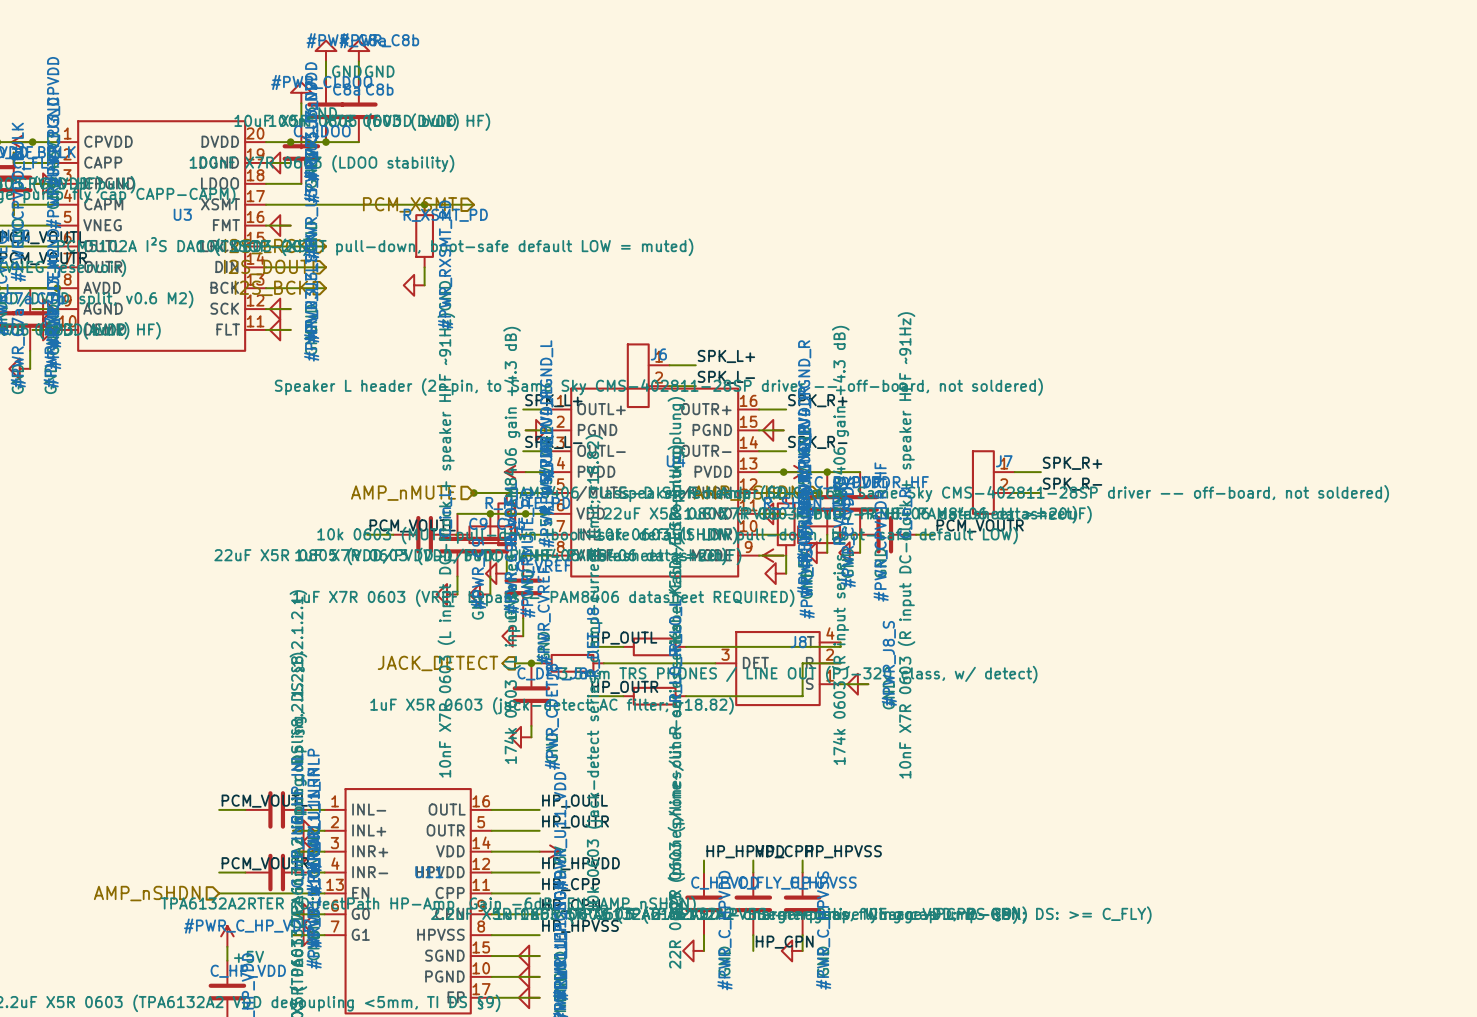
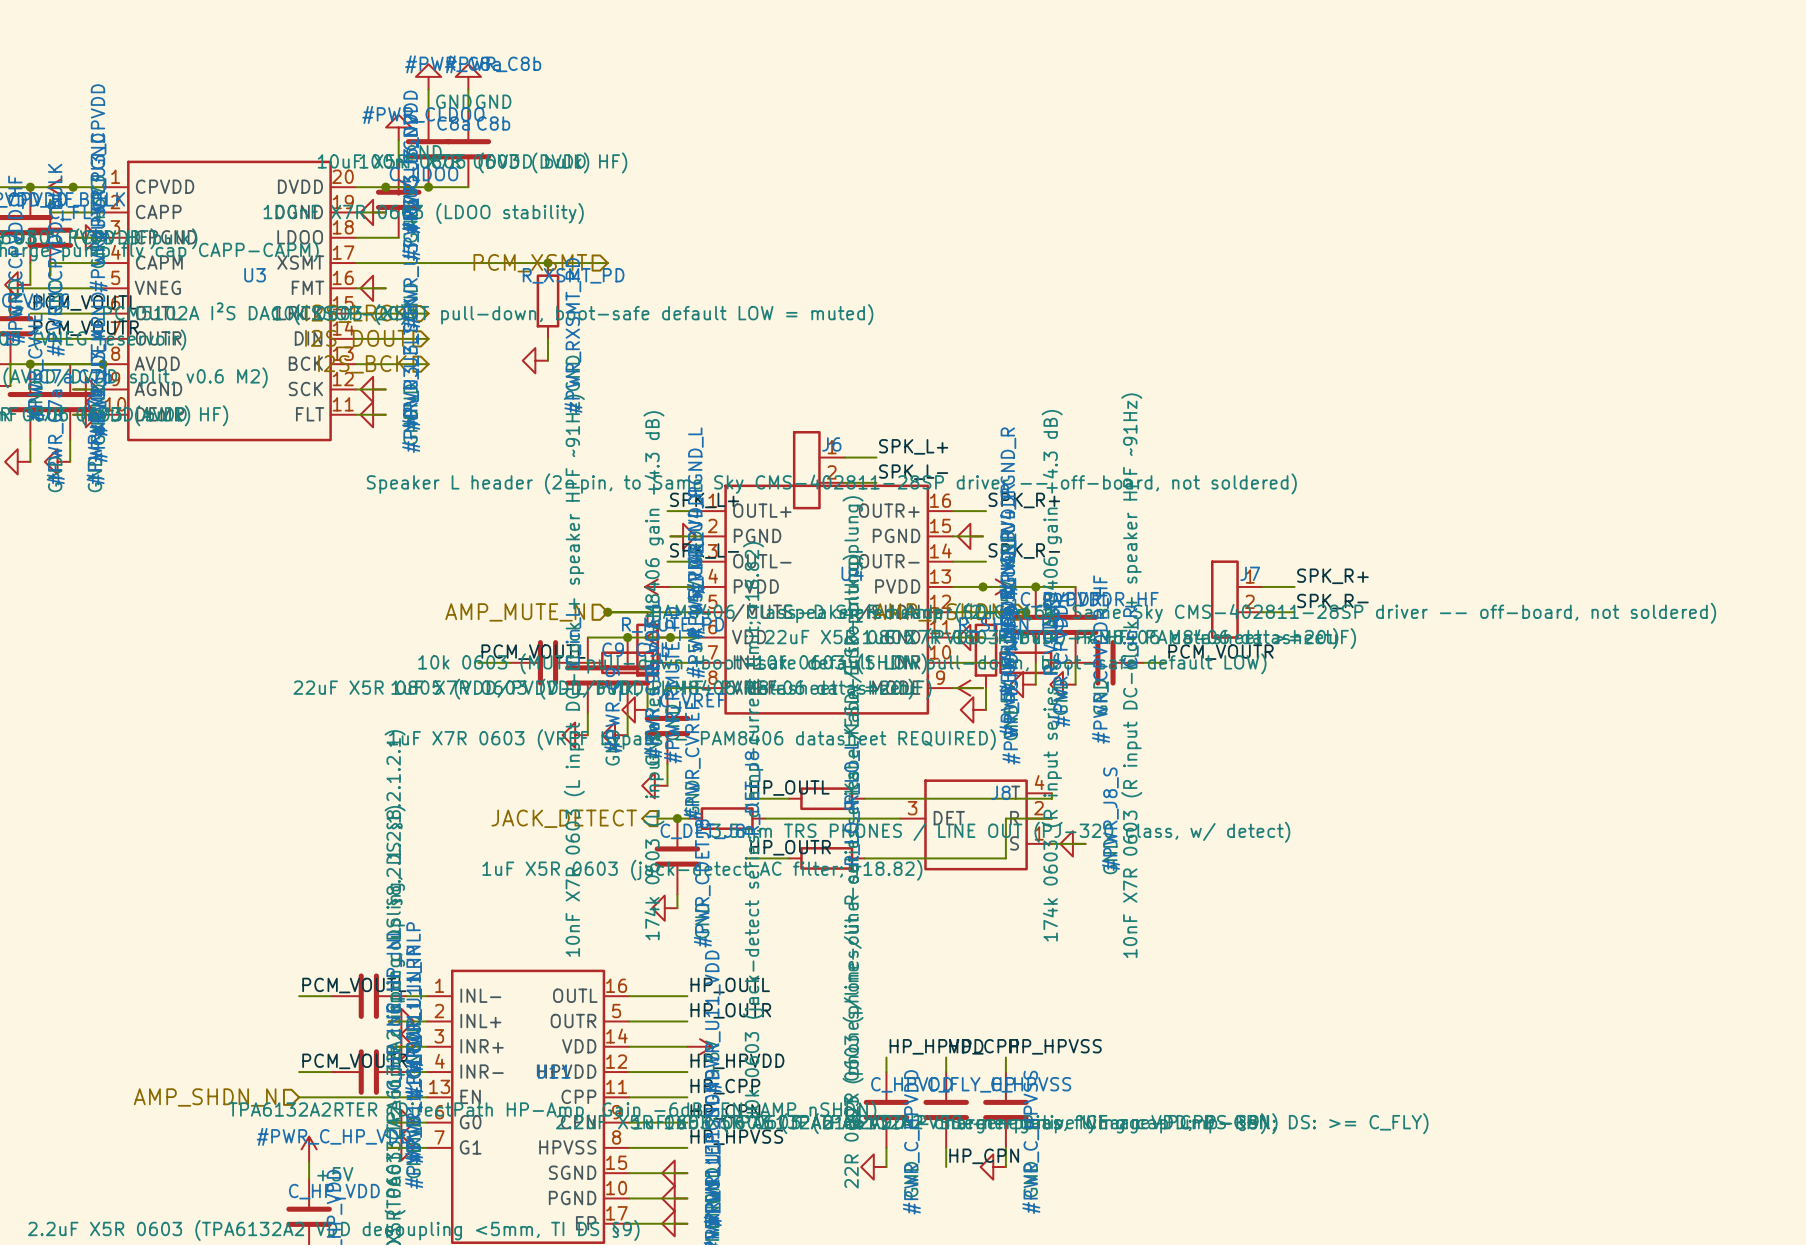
hierarchical label: AMP_nMUTE (403, 493) -> AMP_MUTE_N (515, 612)
hierarchical label: AMP_nSHDN (147, 893) -> AMP_SHDN_N (205, 1097)

